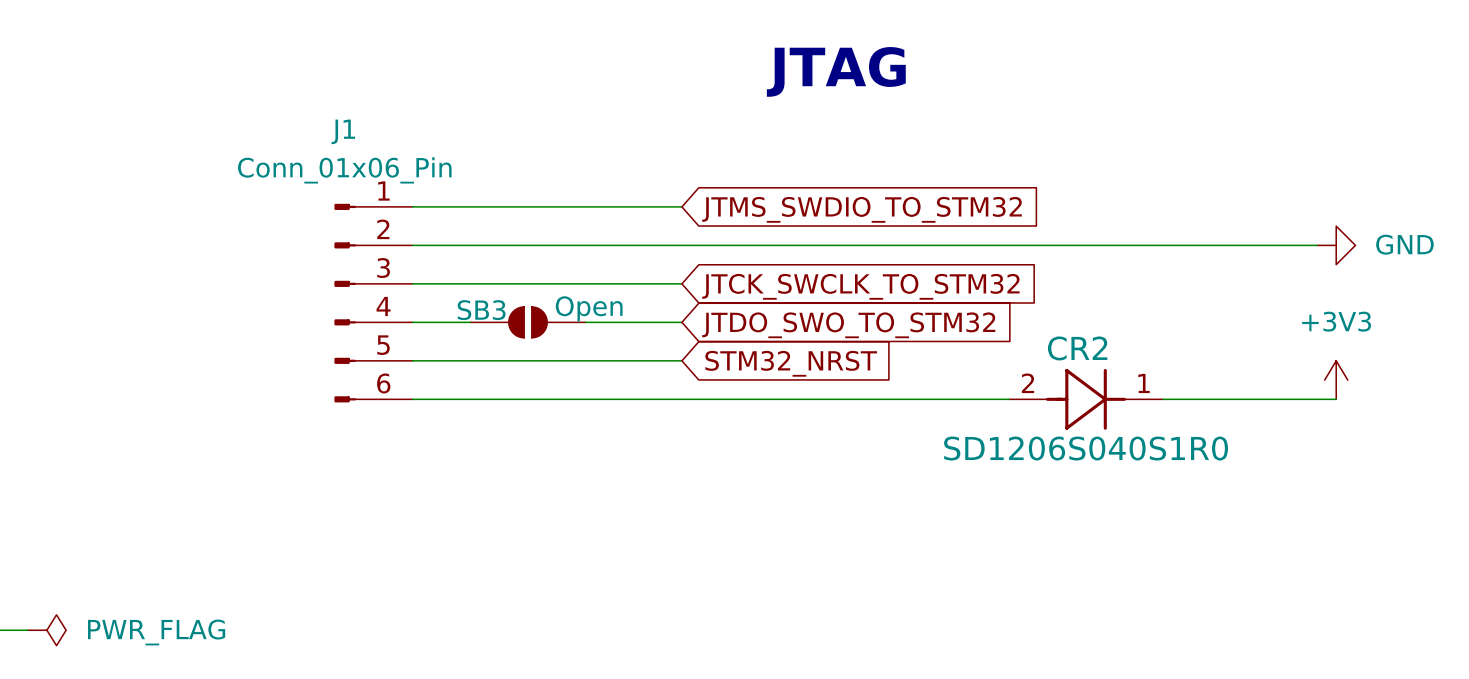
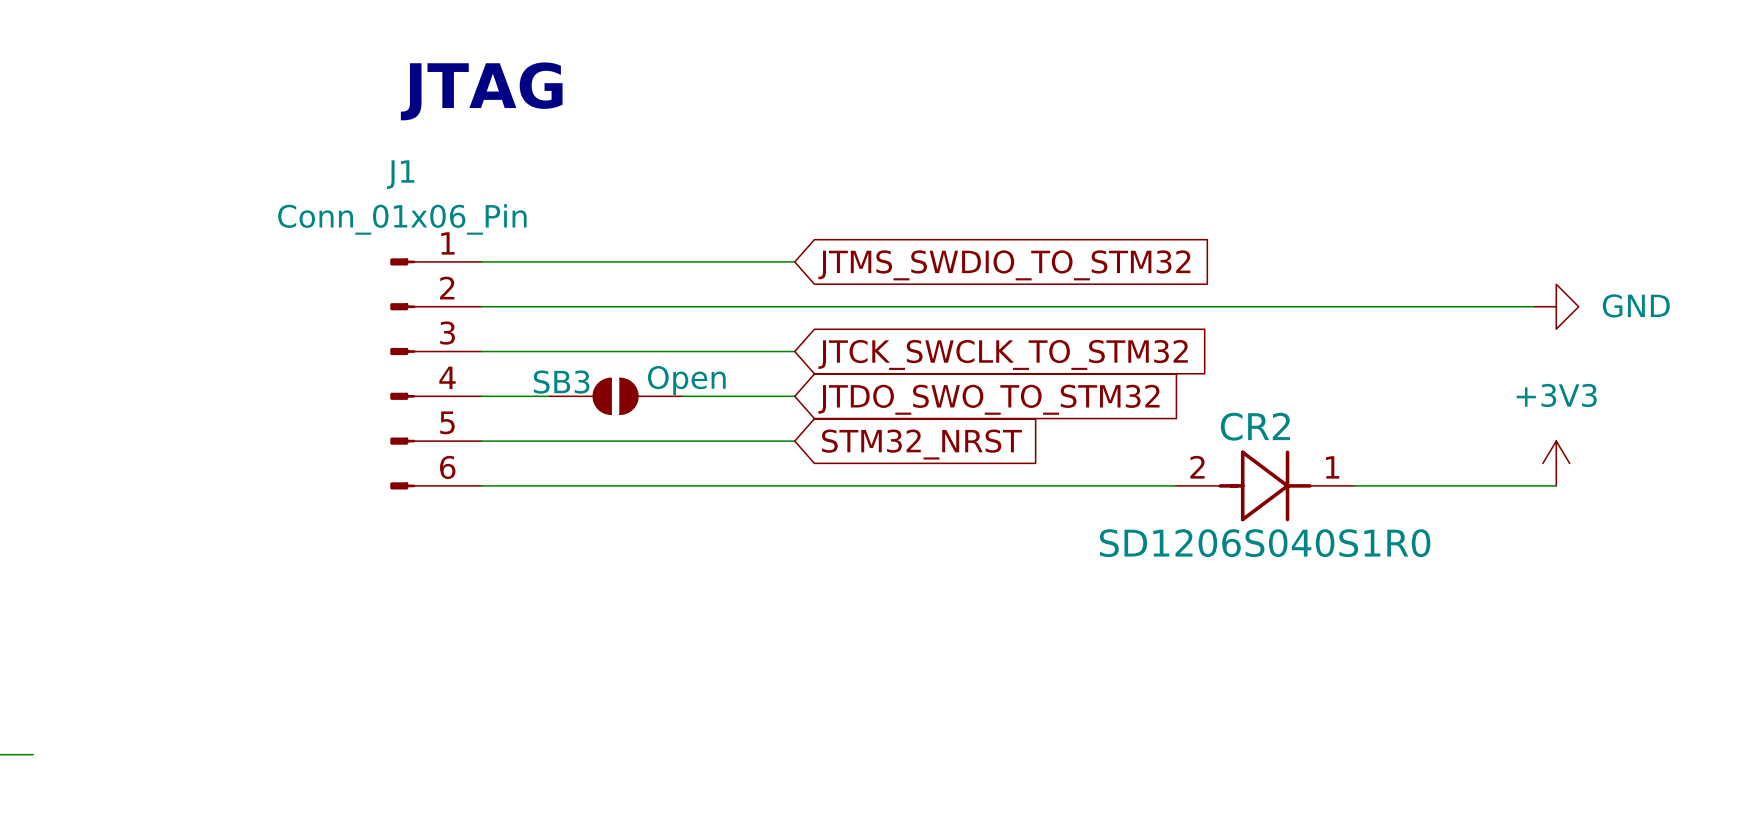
text: none -> JTAG (481, 91)
text: JTAG (836, 71) -> none
power symbol: PWR_FLAG (46, 630) -> none

